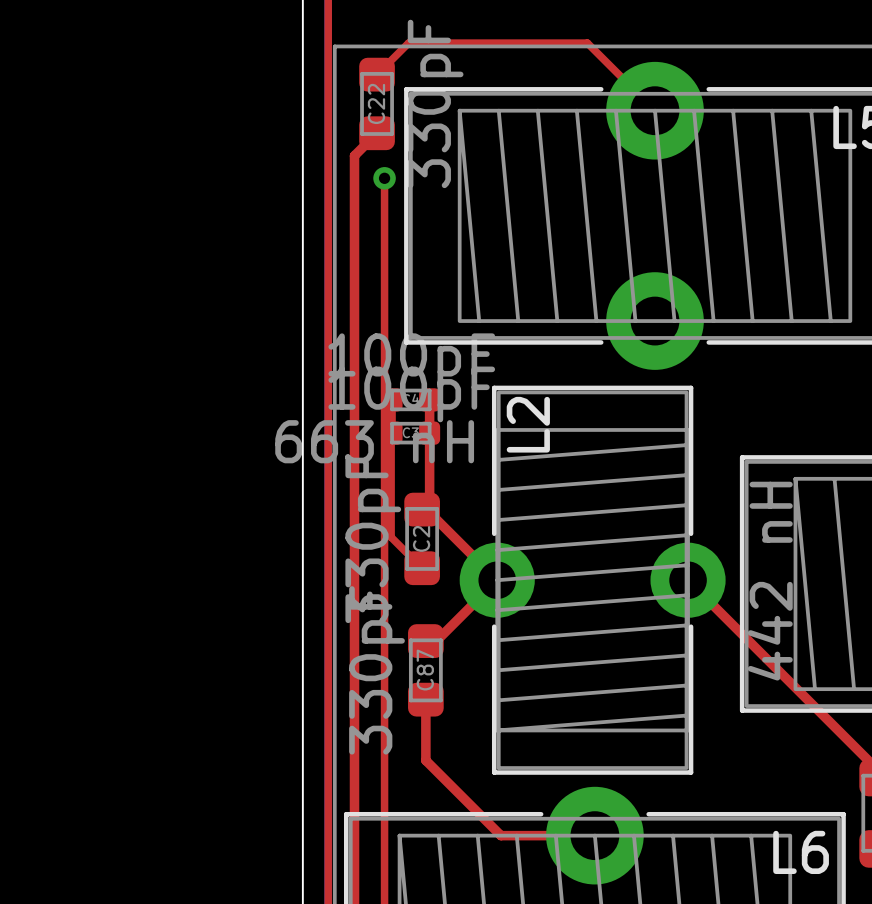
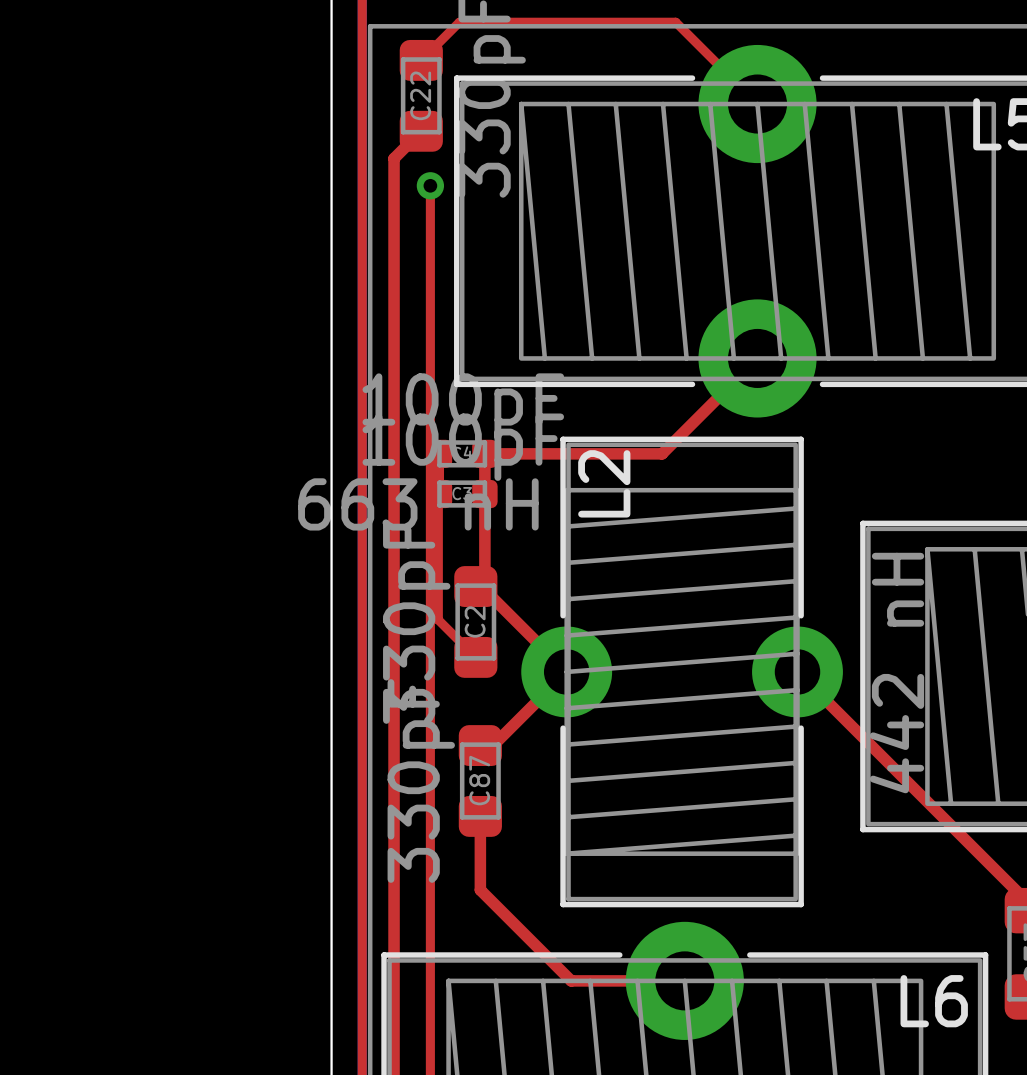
top track: none -> (757, 358) (662, 453) (484, 453)

